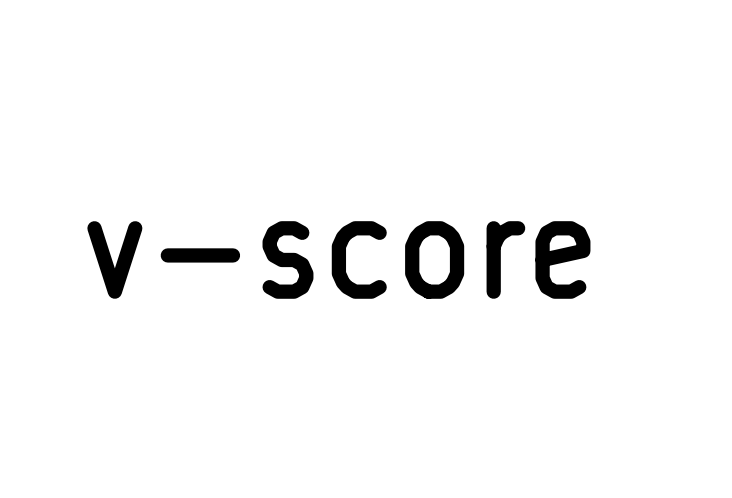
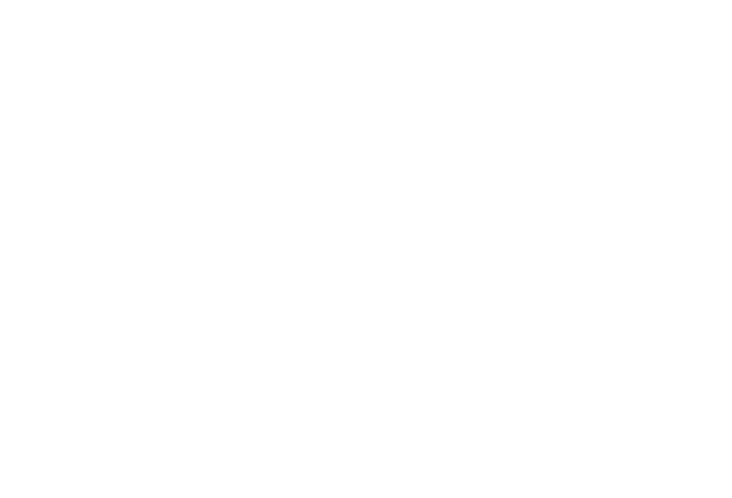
text: v-score (338, 259) -> none

